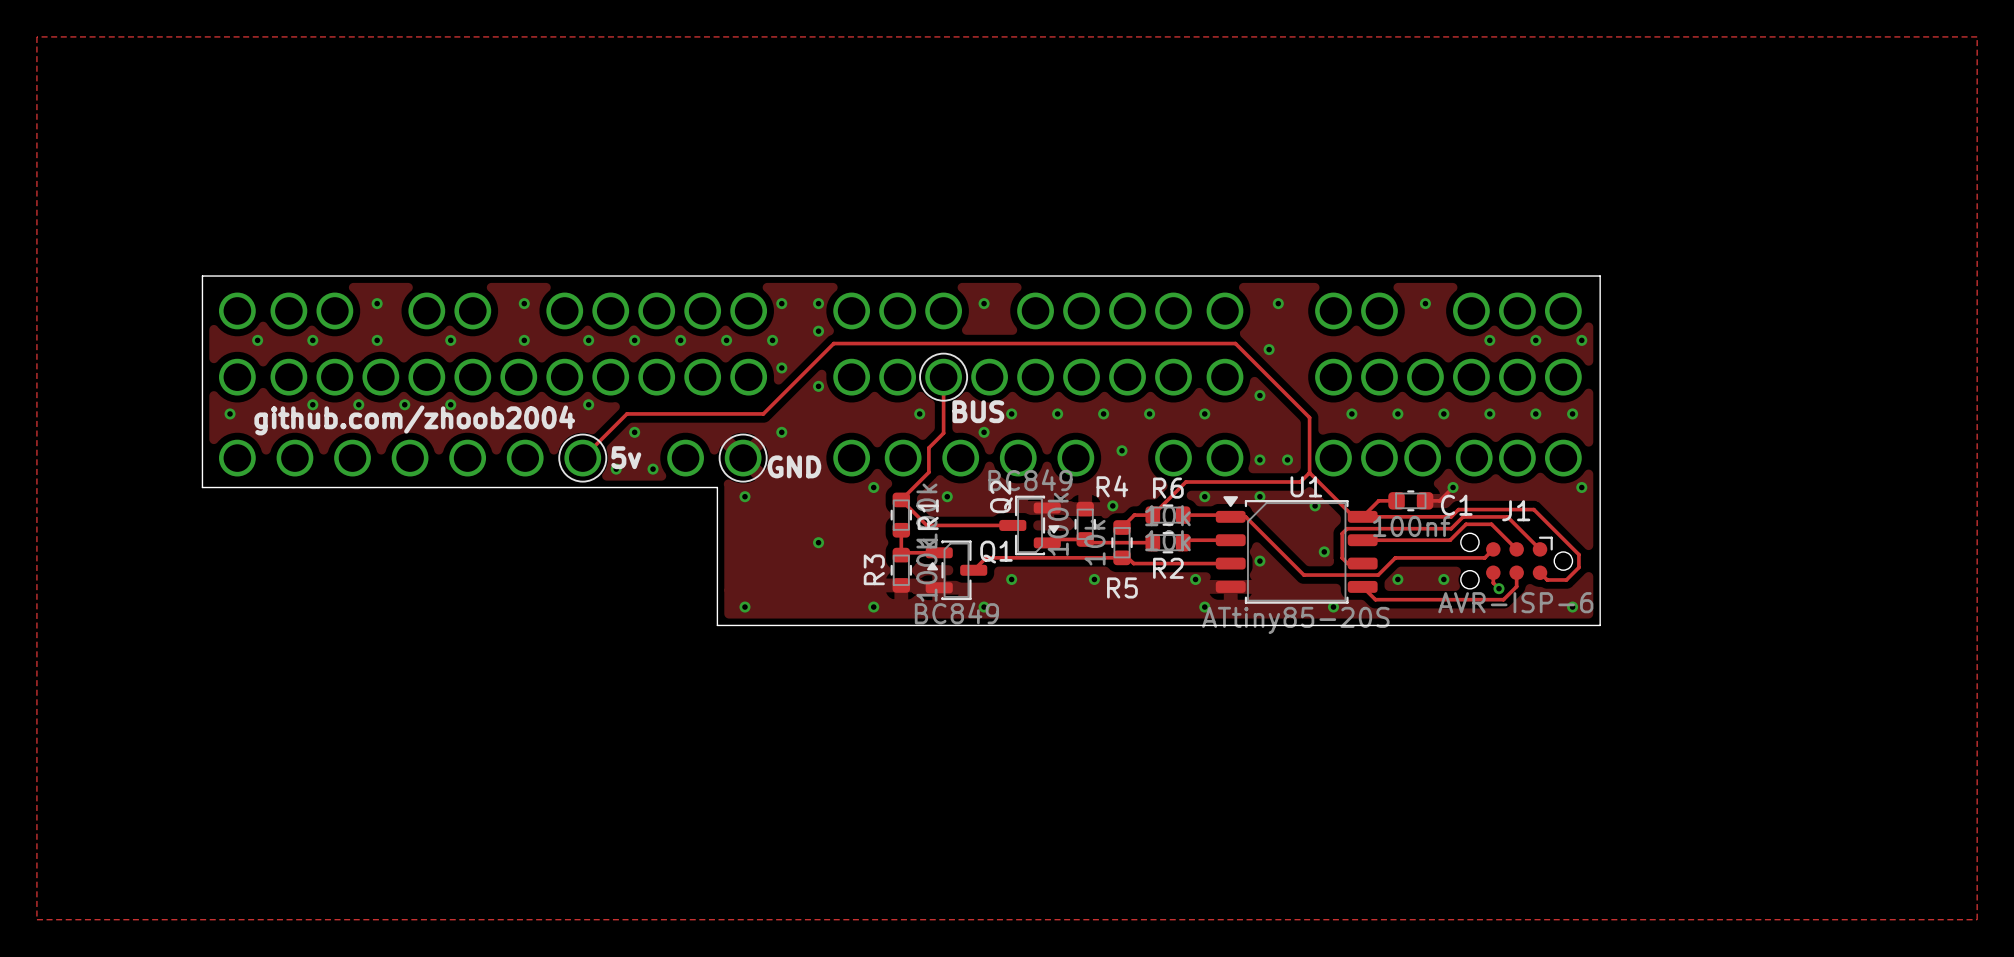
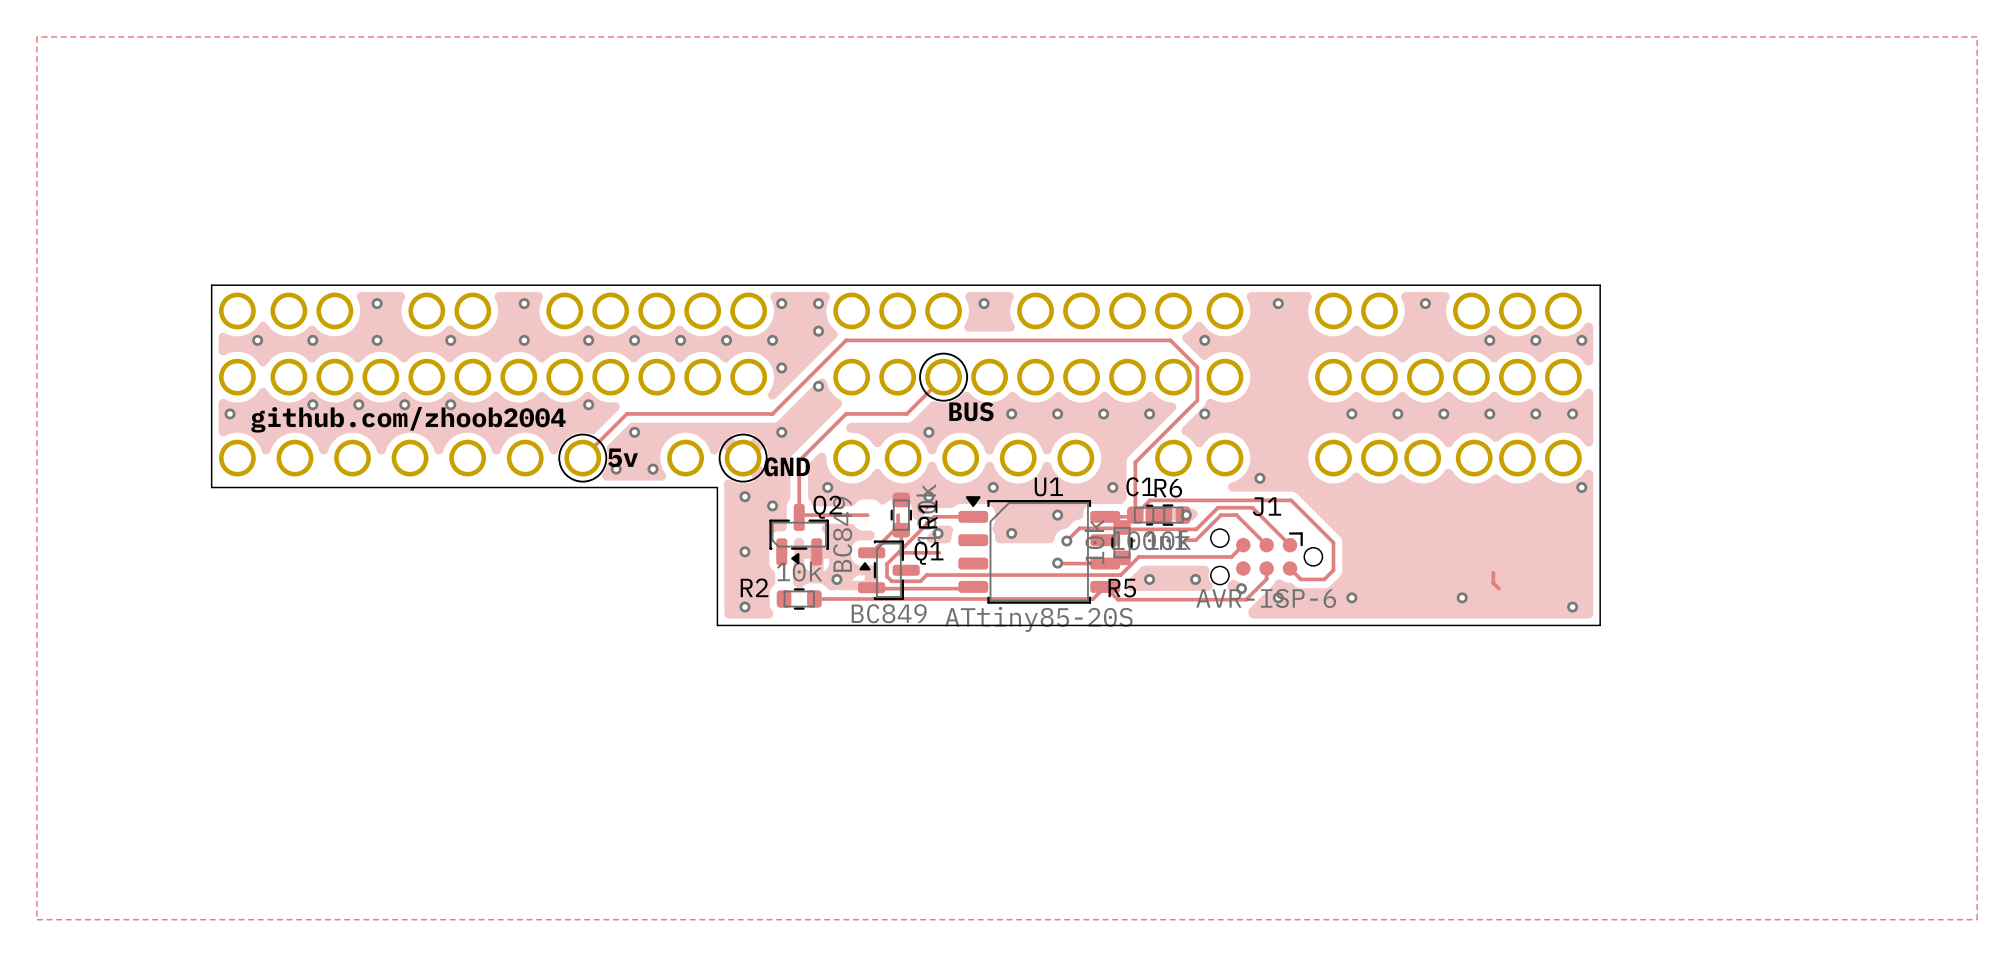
board edge: (1600, 285) (1600, 276) (202, 276) (202, 487) (211, 487) -> (1600, 285) (211, 285) (211, 487)
via: none -> (1204, 340)
via: (1269, 349) -> none
track: (943, 377) (943, 433) (928, 447) (928, 472) (901, 499) (926, 525) (1012, 525) -> (943, 377) (906, 413) (846, 413) (799, 460) (799, 517) (801, 515) (867, 515)
via: (1259, 395) -> none
track: (763, 413) (833, 343) (1235, 343) (1309, 417) (1309, 472) -> (763, 413) (772, 413) (846, 340) (1170, 340) (1197, 367) (1197, 400) (1135, 462) (1135, 515)
via position: (919, 413) -> (928, 432)
via: (984, 432) -> none
via: (1122, 450) -> none
via: (1259, 459) -> none
via: (1287, 459) -> none
track: (1309, 472) (1353, 516) (1451, 516) (1458, 509) (1533, 509) (1578, 554) (1578, 567) (1566, 579) (1547, 579) (1540, 572) -> none
track: (1309, 472) (1300, 481) (1185, 481) (1152, 515) (1134, 515) (1122, 527) -> none
via: none -> (1259, 478)
via: none -> (827, 487)
via: (873, 487) -> none
via: none -> (993, 487)
track: (1453, 487) (1439, 500) (1425, 500) -> none
via: (1453, 487) -> none
via position: (947, 496) -> (928, 496)
via position: (1204, 496) -> (1186, 515)
via: (1259, 496) -> none
track: (1396, 500) (1378, 500) (1362, 516) -> none
C1 position: (1410, 500) -> (1149, 515)
via: none -> (772, 505)
via position: (1112, 505) -> (1112, 487)
via: (1315, 505) -> none
C1 name position: C1 (1456, 505) -> C1 (1140, 486)
track: none -> (898, 515) (898, 526) (871, 552)
via: none -> (1057, 515)
track: (1183, 515) (1221, 515) -> none
track: (1228, 515) (1230, 516) (1245, 516) (1303, 575) (1378, 575) (1395, 557) (1484, 557) (1493, 549) -> (1228, 515) (1236, 515) (1266, 545)
track: none -> (973, 516) (934, 516) (887, 564) (887, 576) (891, 581) (920, 581) (926, 575) (1120, 575) (1138, 556) (1231, 556) (1243, 545)
track: none -> (1105, 516) (1133, 516) (1150, 500) (1291, 500) (1333, 542) (1333, 570) (1324, 579) (1300, 579) (1290, 568)
R4: 100k (1085, 524) -> none
Q2 rotation: 0° (1030, 525) -> 90° clockwise (799, 534)
Q2 position: (1030, 525) -> (799, 534)
via: none -> (938, 533)
via: none -> (1011, 533)
track: (1195, 540) (1230, 540) -> (1195, 540) (1221, 515)
track: (1362, 540) (1450, 540) (1466, 524) (1491, 524) (1516, 549) -> none
track: none -> (1066, 541) (1079, 528) (1196, 529) (1217, 507) (1252, 507) (1290, 545)
via: none -> (1066, 541)
via: (818, 542) -> none
track: (1152, 542) (1088, 542) (1085, 539) (1050, 539) (1047, 542) -> none
R2 position: (1167, 542) -> (799, 599)
U1 position: (1296, 549) -> (1039, 549)
track: (1540, 549) (1507, 516) (1463, 516) (1451, 528) (1347, 528) (1342, 533) (1342, 558) (1347, 563) (1362, 563) -> none
via: none -> (744, 551)
via: (1324, 551) -> none
via: (1259, 561) -> none
J1 position: (1516, 561) -> (1266, 556)
track: none -> (1057, 563) (1105, 563)
via: none -> (1057, 563)
track: (1230, 563) (1133, 563) (1127, 557) (986, 557) (973, 570) -> none
R2 name position: R2 (1168, 568) -> R2 (754, 587)
track: none -> (1266, 568) (1266, 579) (1246, 599) (1118, 599) (1105, 586) (1093, 599) (814, 599)
R3: 100k (901, 570) -> none
Q1 position: (956, 570) -> (888, 570)
track: (1516, 572) (1516, 586) (1503, 599) (1375, 599) (1362, 586) -> none
via: none -> (836, 579)
via: (1011, 579) -> none
via: (1094, 579) -> none
via: none -> (1149, 579)
via: (1397, 579) -> none
via: (1443, 579) -> none
track: none -> (973, 586) (971, 588) (871, 587)
via: none -> (1241, 588)
via: (1499, 588) -> none
via: none -> (1278, 597)
via: none -> (1462, 597)
via: (873, 607) -> none
via: (984, 607) -> none
via: (1204, 607) -> none
via position: (1333, 607) -> (1351, 597)

